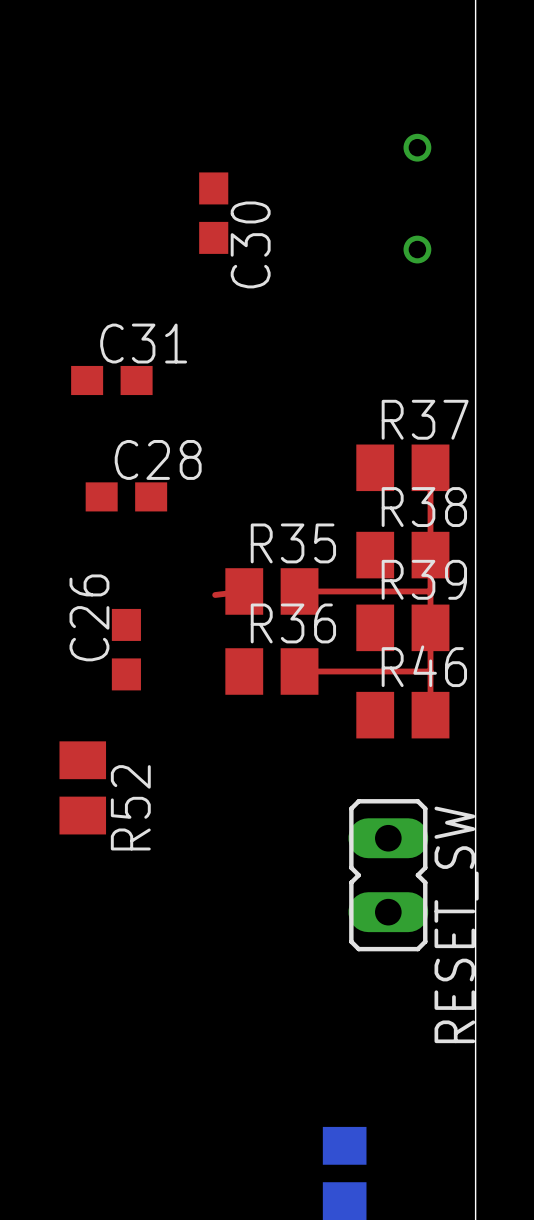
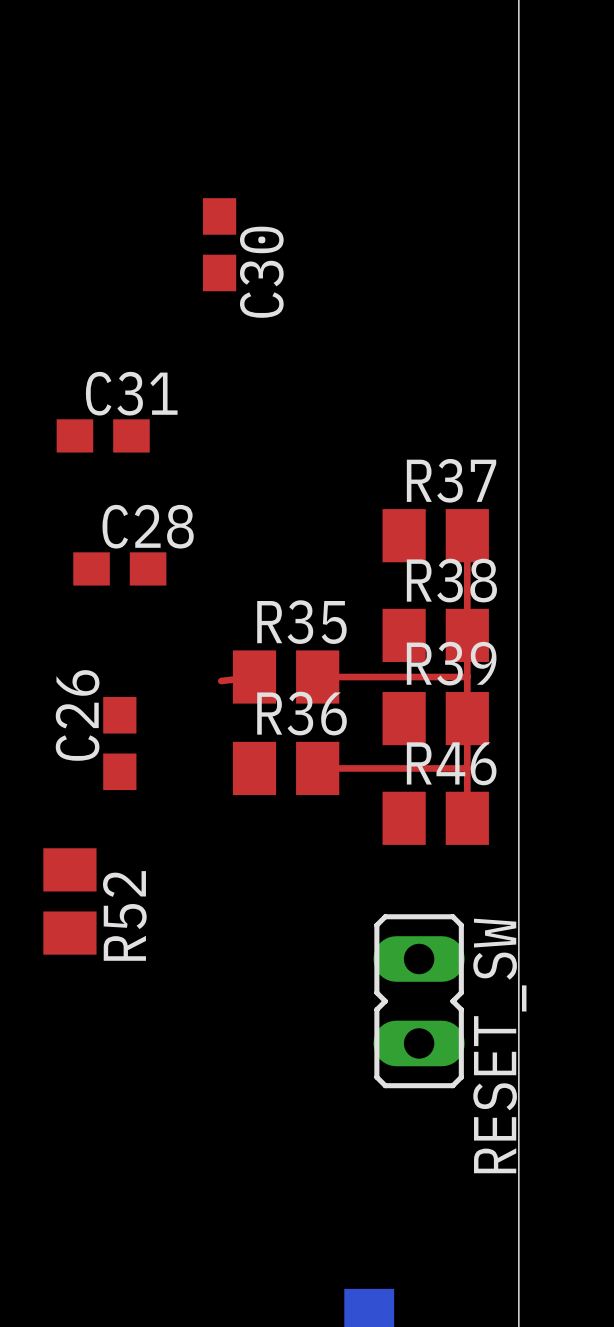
via: (417, 147) -> none
via: (417, 249) -> none

